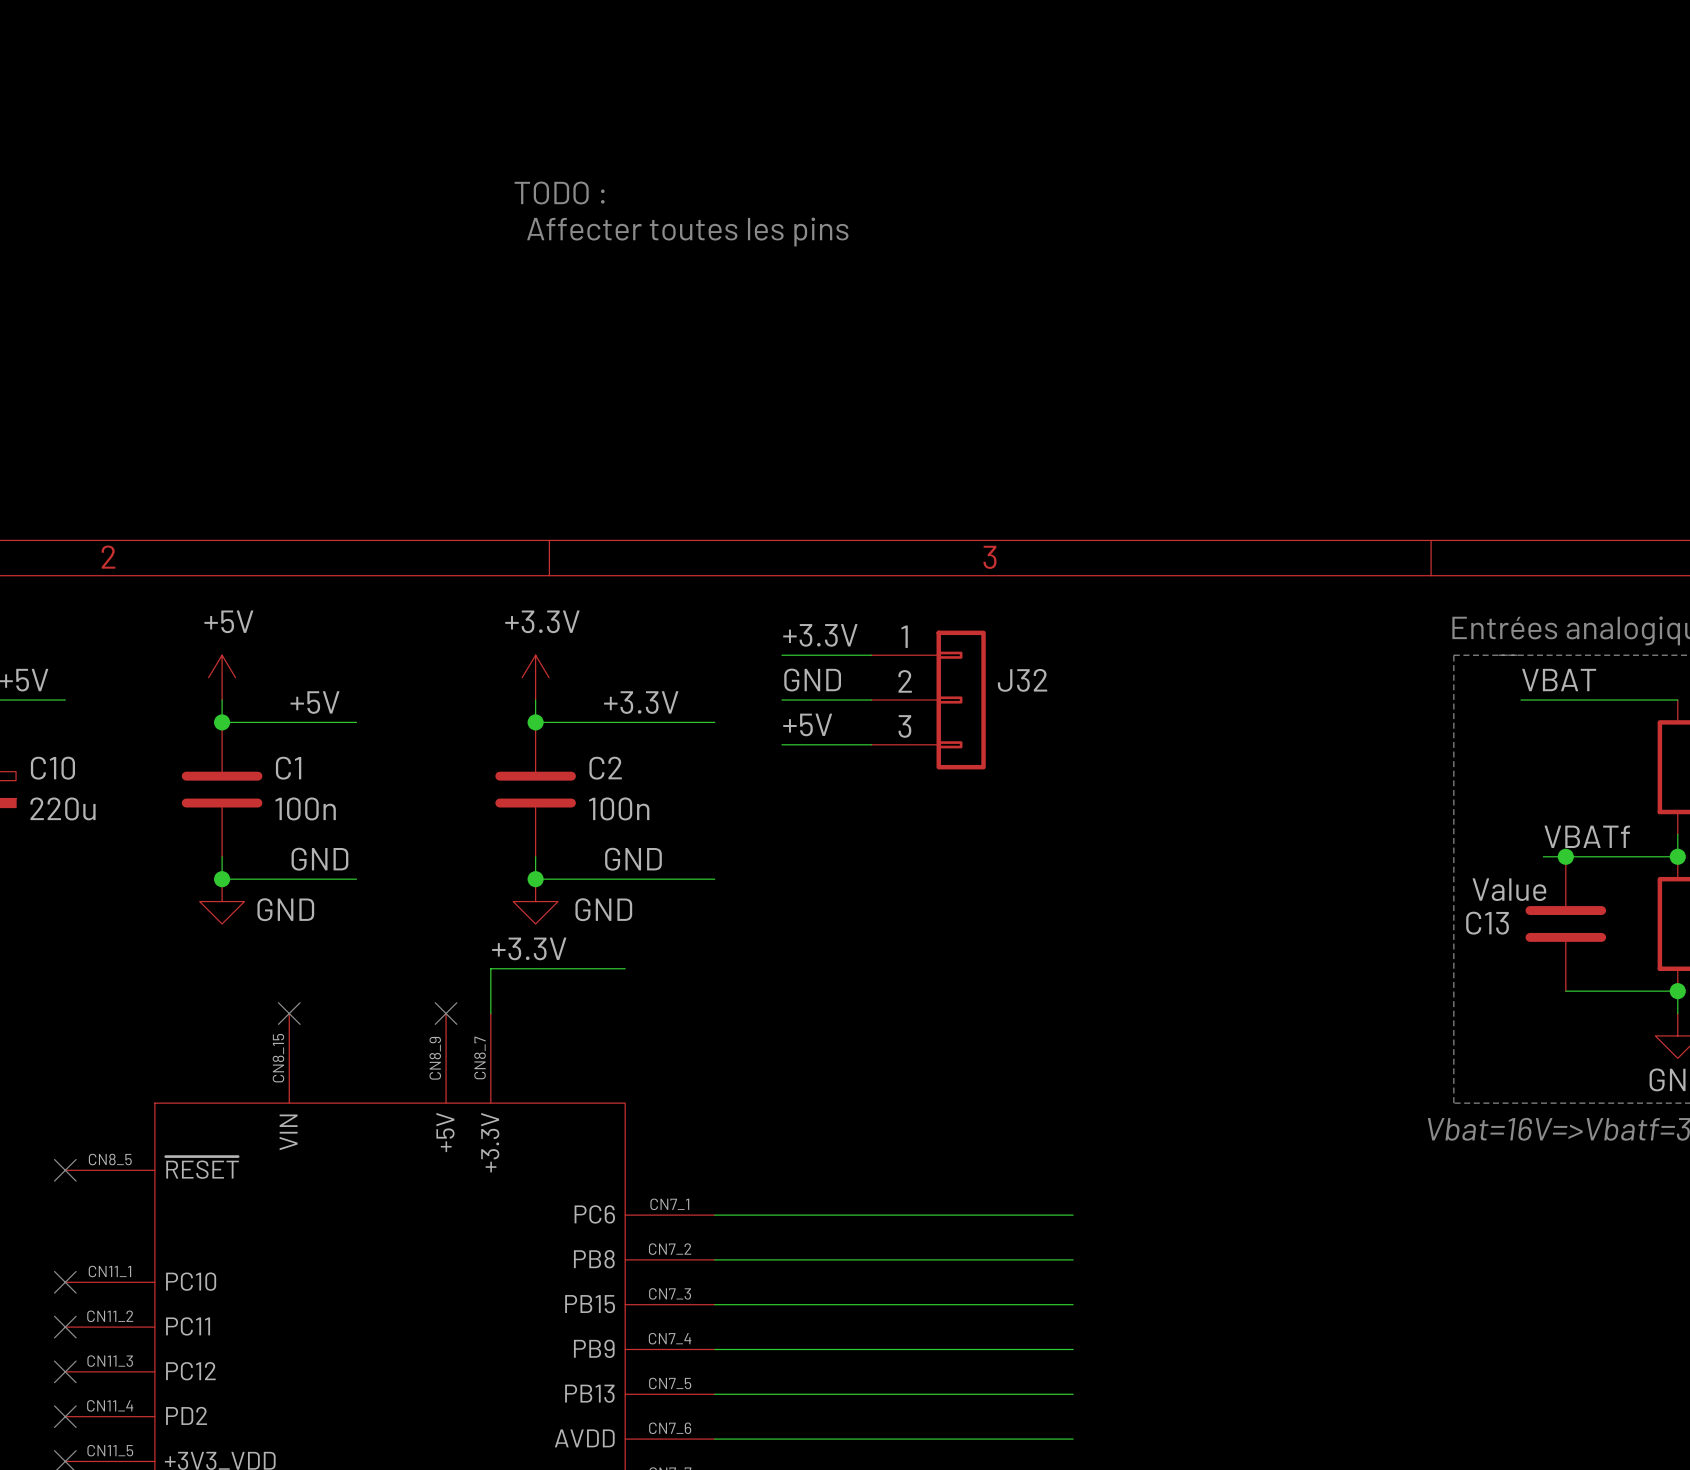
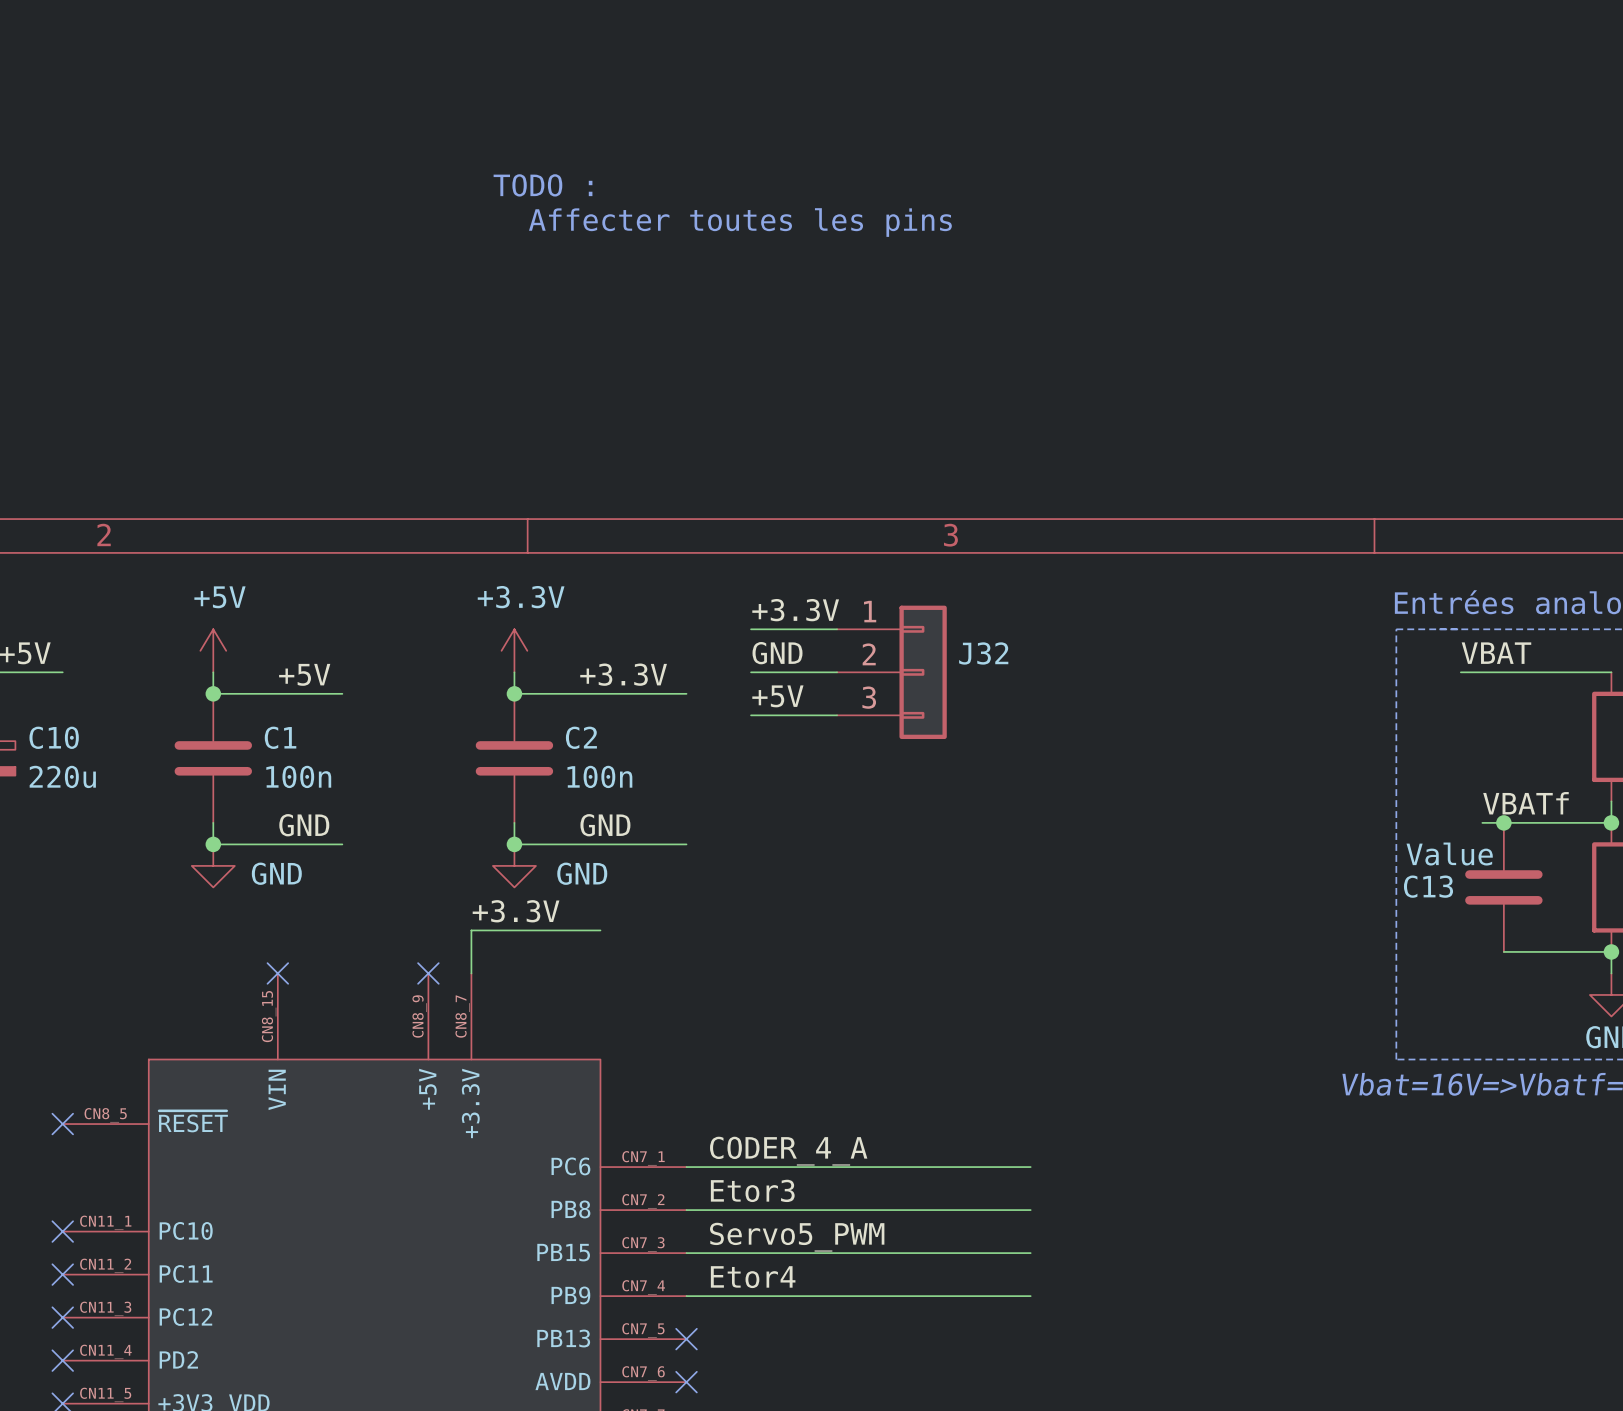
label: none -> CODER_4_A (788, 1151)
label: none -> Etor3 (752, 1190)
label: none -> Servo5_PWM (797, 1237)
label: none -> Etor4 (753, 1277)
wire: (714, 1394) (1073, 1394) -> none
no-connect mark: none -> (686, 1339)
wire: (714, 1439) (1073, 1439) -> none
no-connect mark: none -> (686, 1382)

